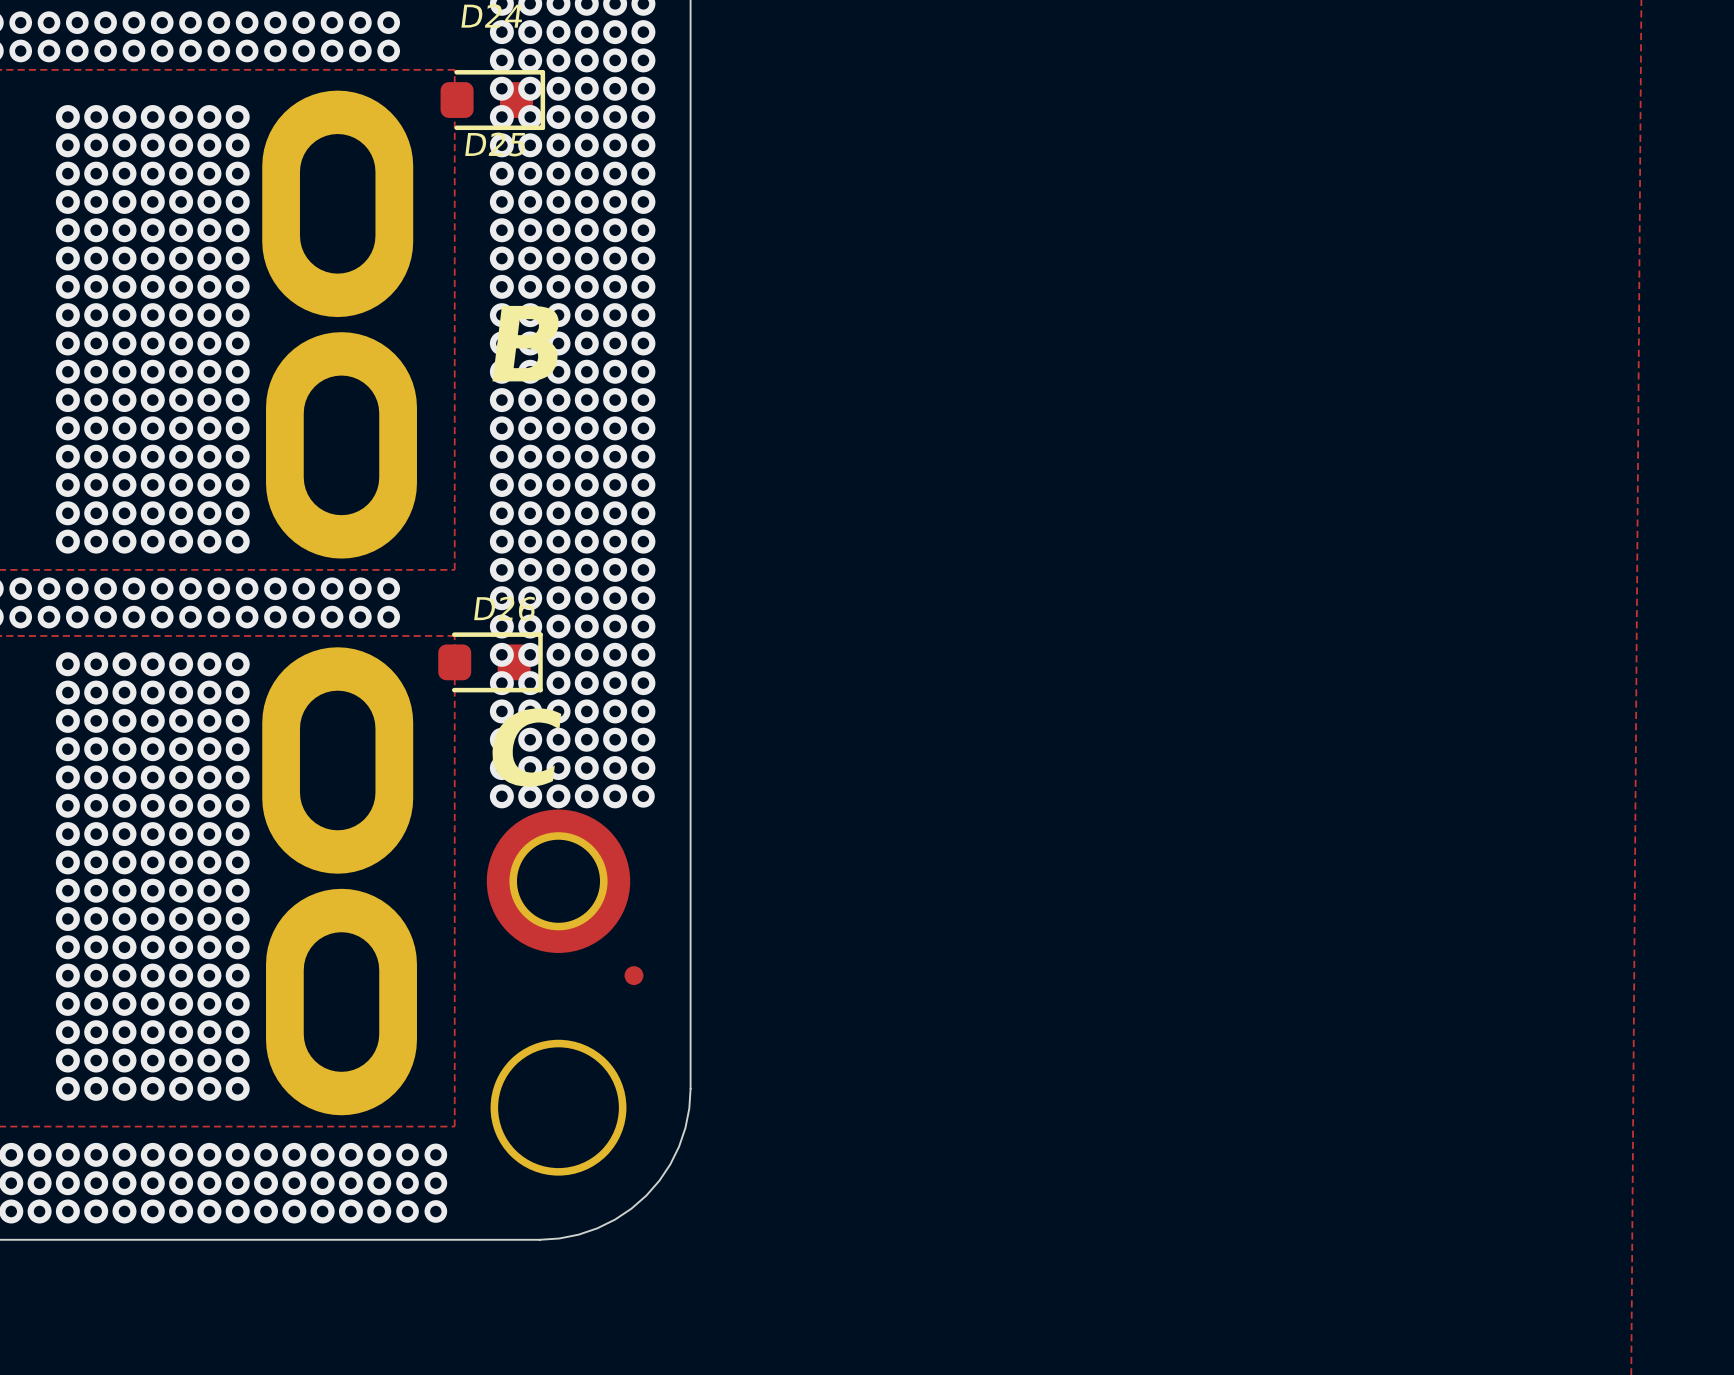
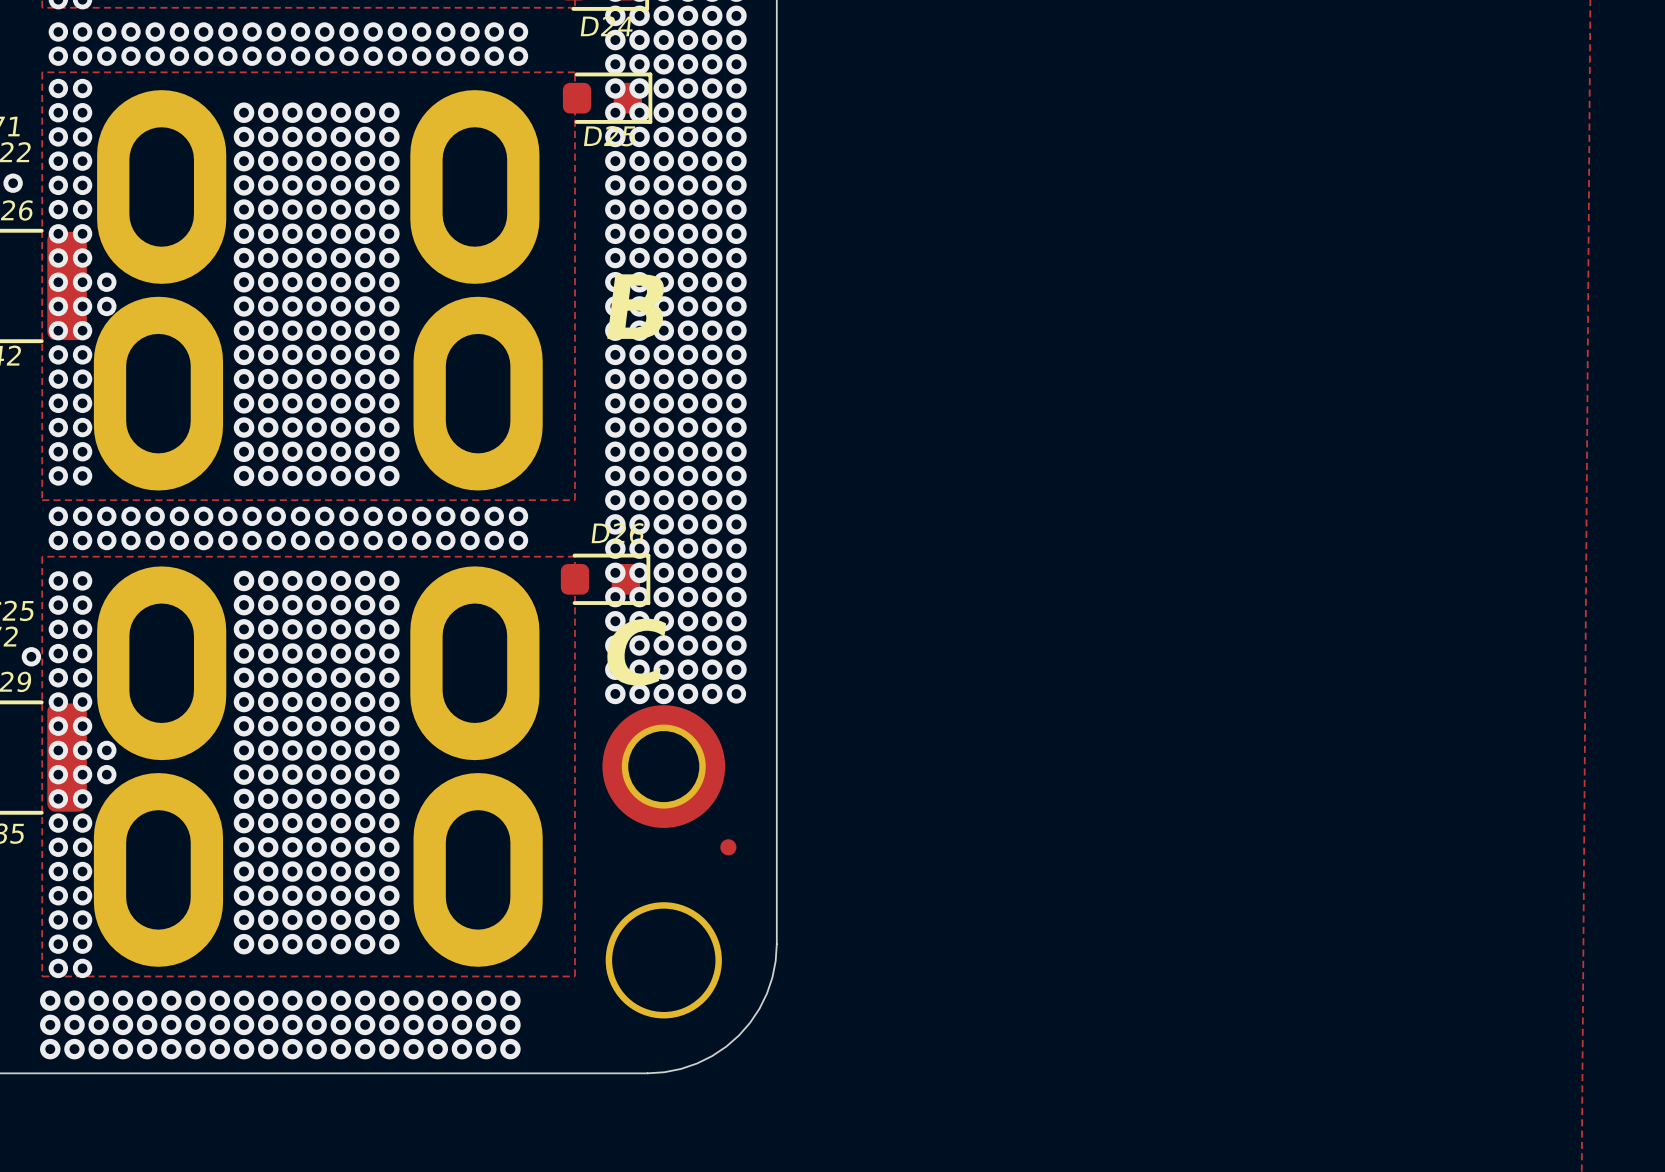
via: (407, 1154) -> none
via: (435, 1154) -> none
via: (407, 1183) -> none
via: (435, 1183) -> none
via: (407, 1211) -> none
via: (435, 1211) -> none

